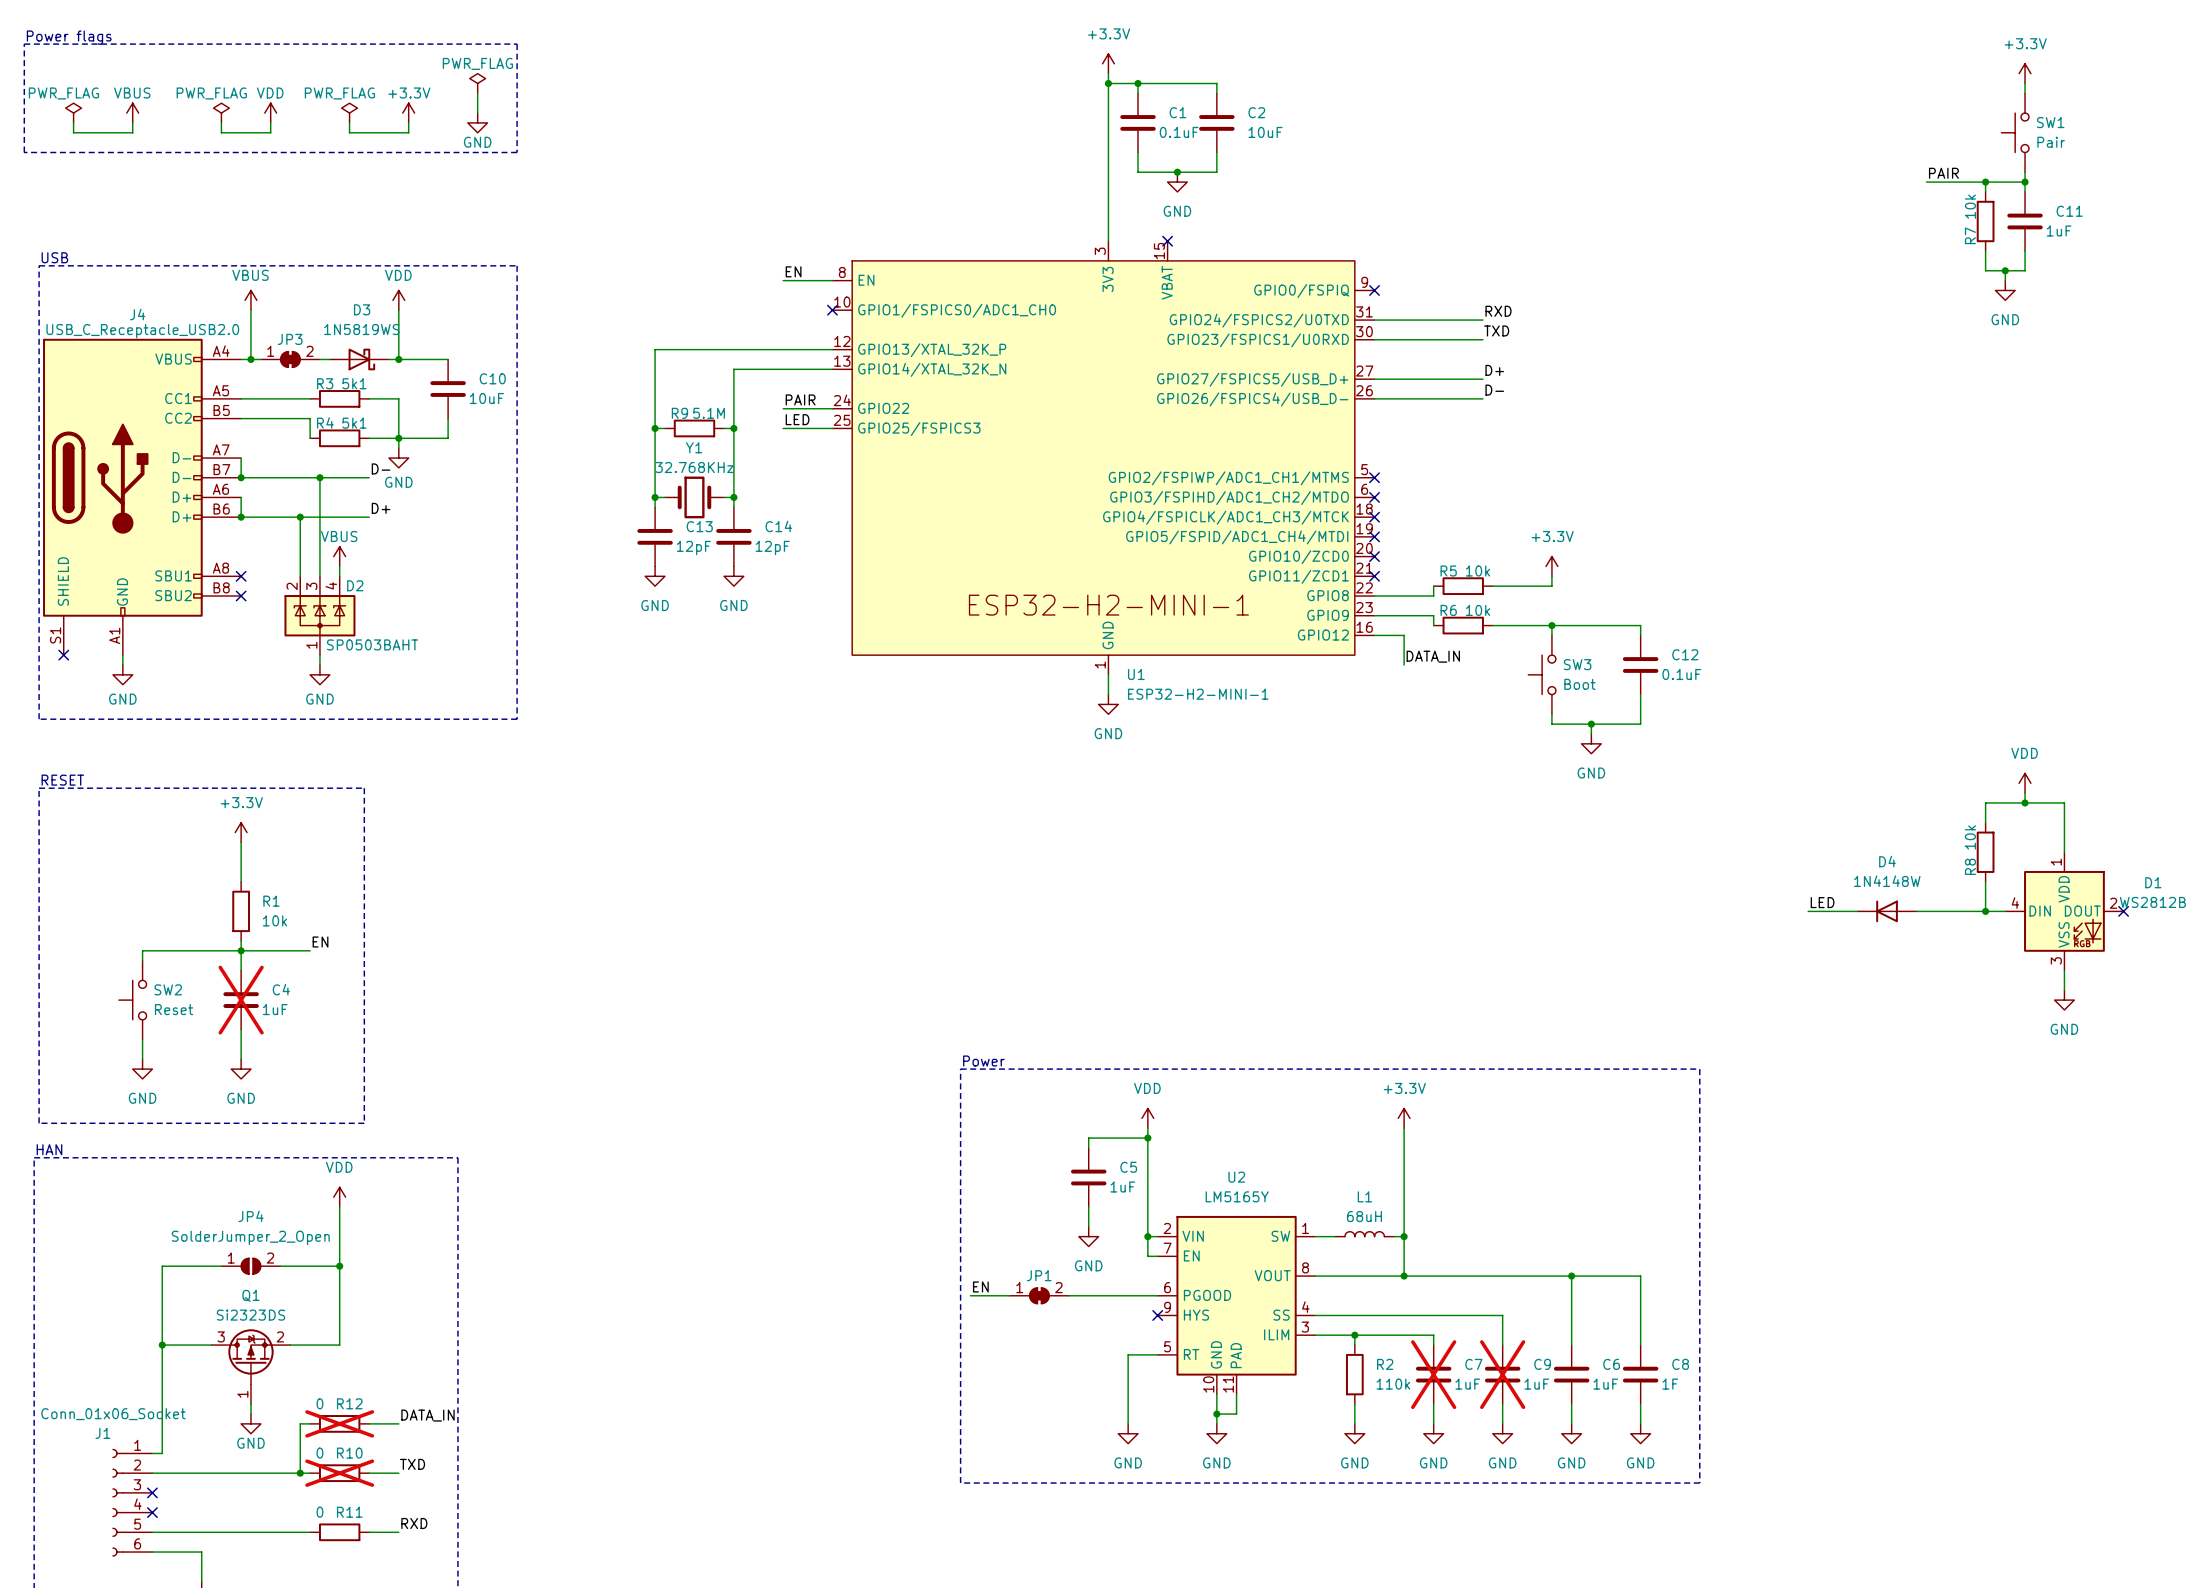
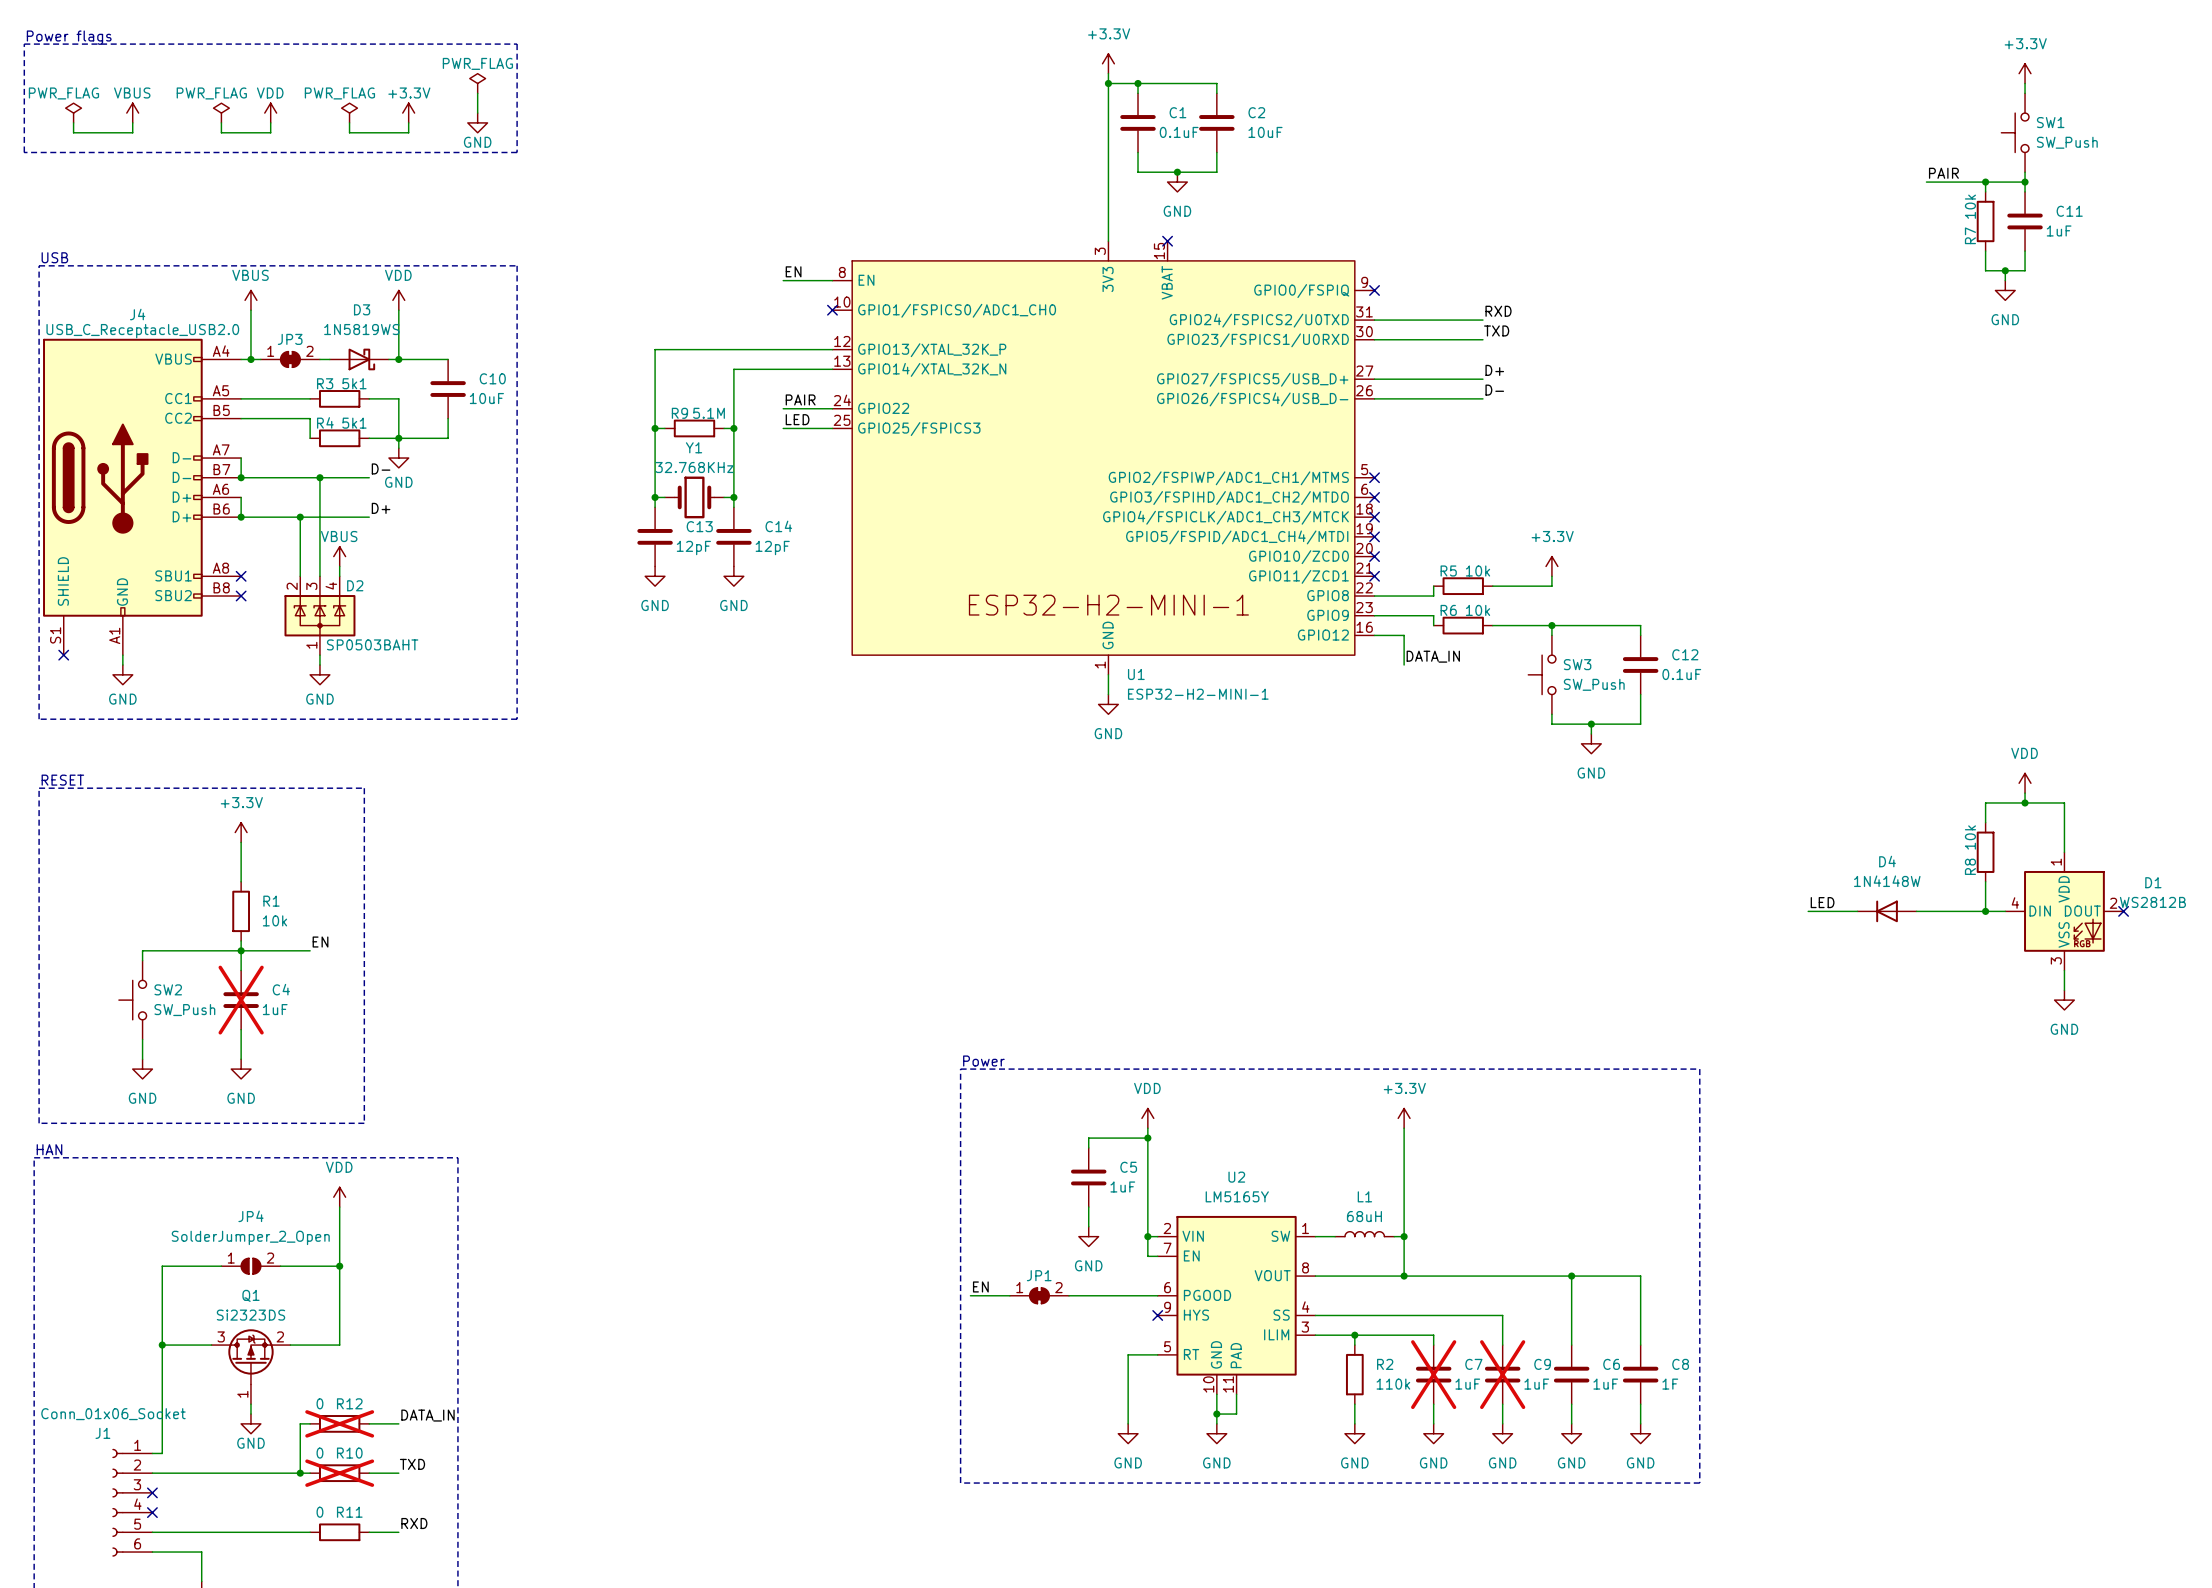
SW1 value: Pair (2051, 142) -> SW_Push (2067, 142)
SW3 value: Boot (1579, 684) -> SW_Push (1594, 684)
SW2 value: Reset (174, 1009) -> SW_Push (184, 1010)

